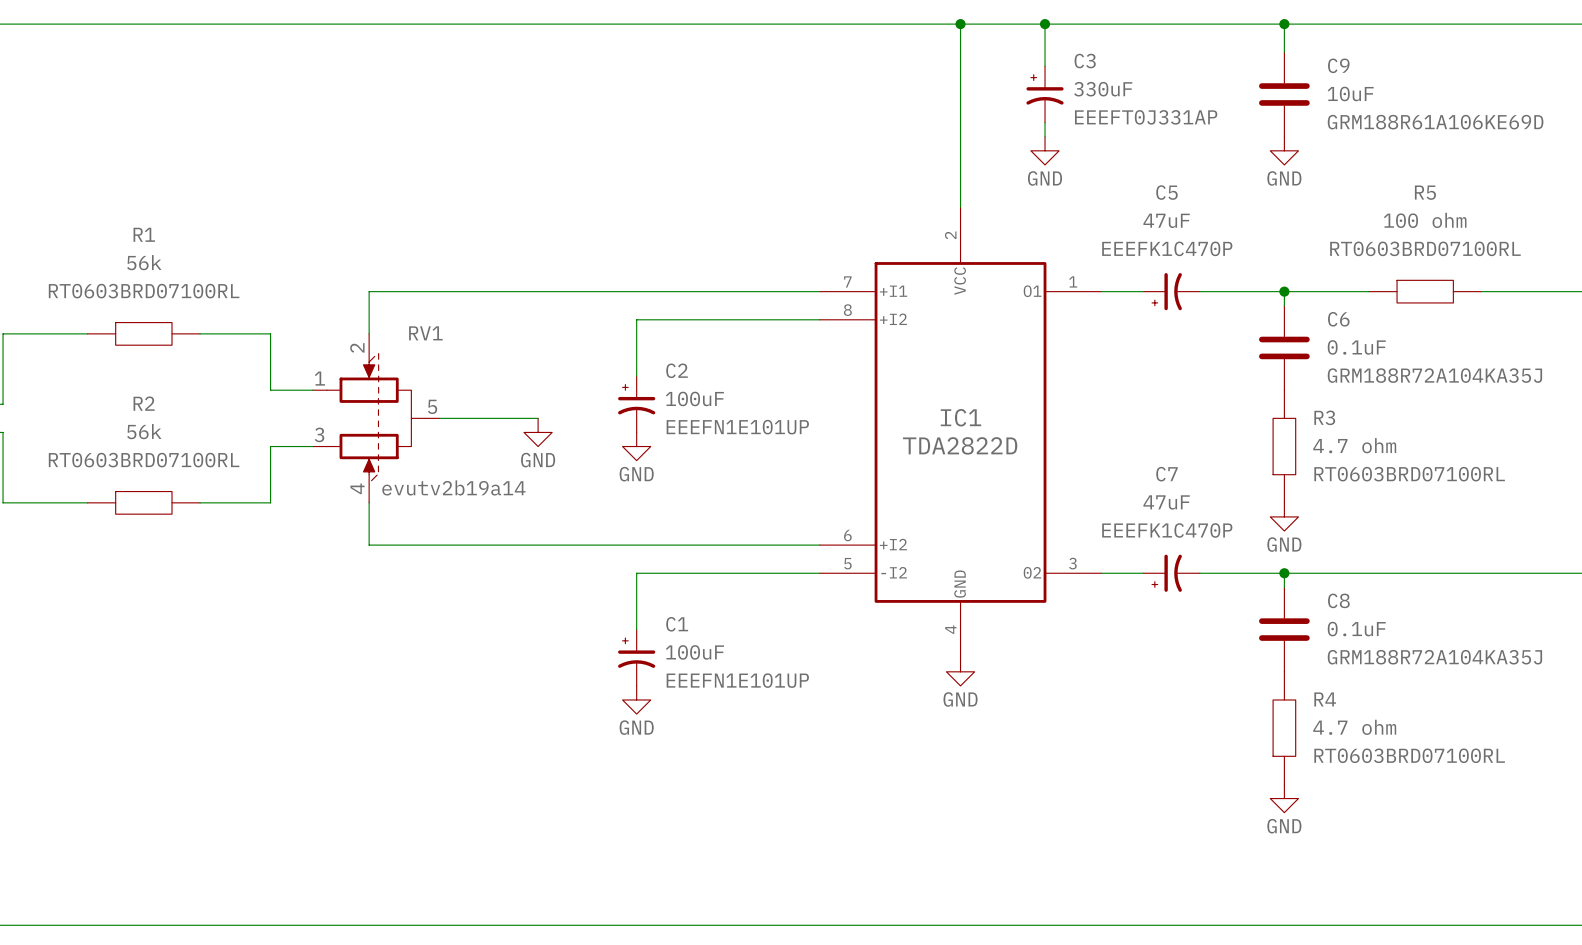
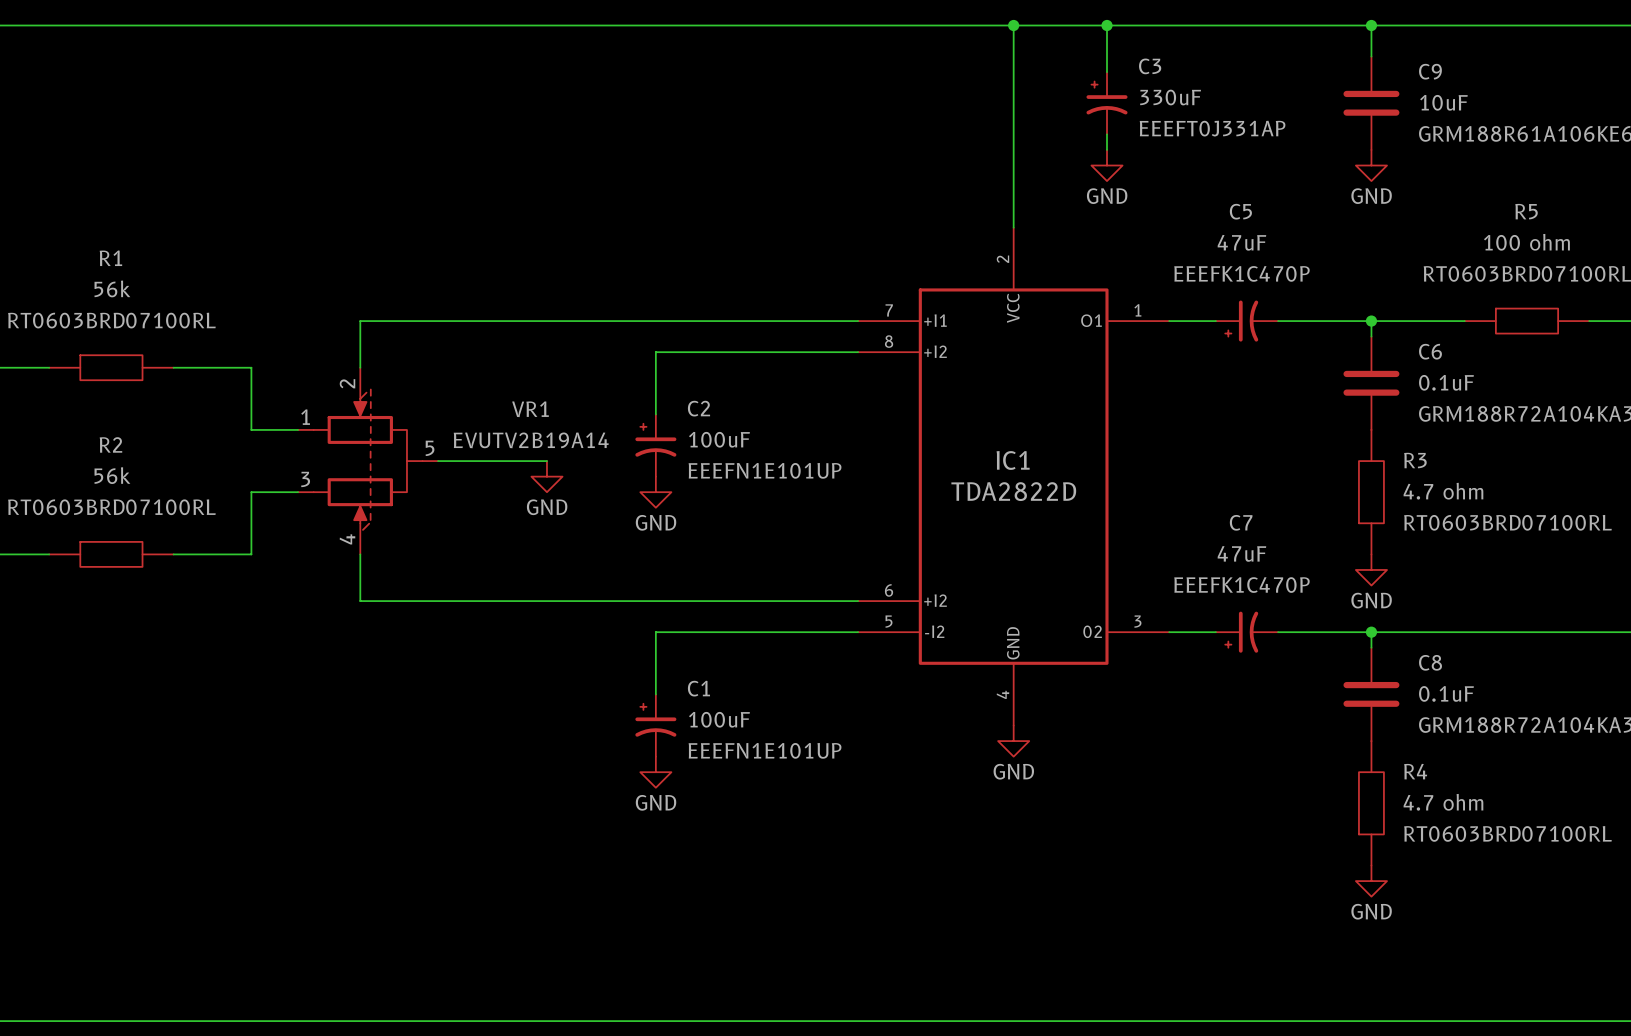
RV1 name: RV1 (425, 333) -> VR1 (530, 409)
RV1 value: evutv2b19a14 (453, 487) -> EVUTV2B19A14 (531, 440)

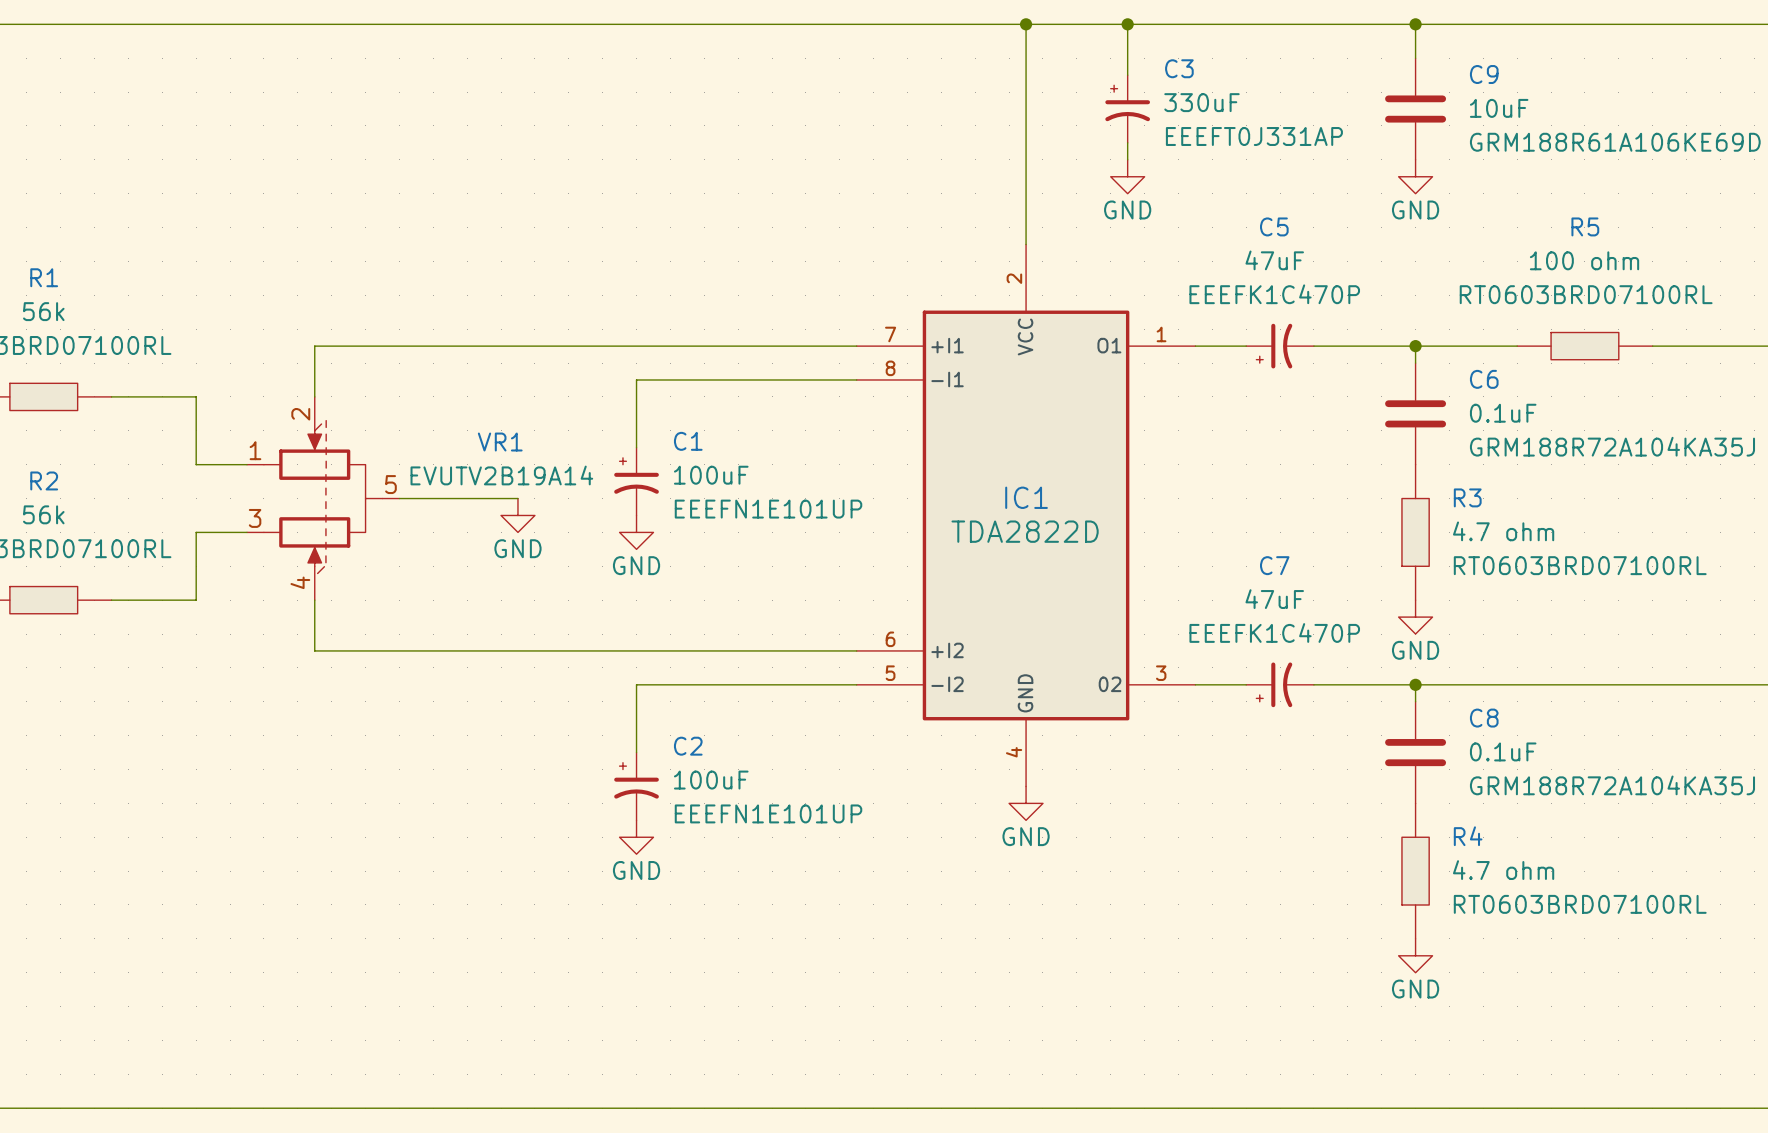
IC1 pin name: +I2 (935, 351) -> -I1 (947, 379)
C2 name: C2 (698, 408) -> C1 (688, 441)
C1 name: C1 (698, 688) -> C2 (688, 746)

